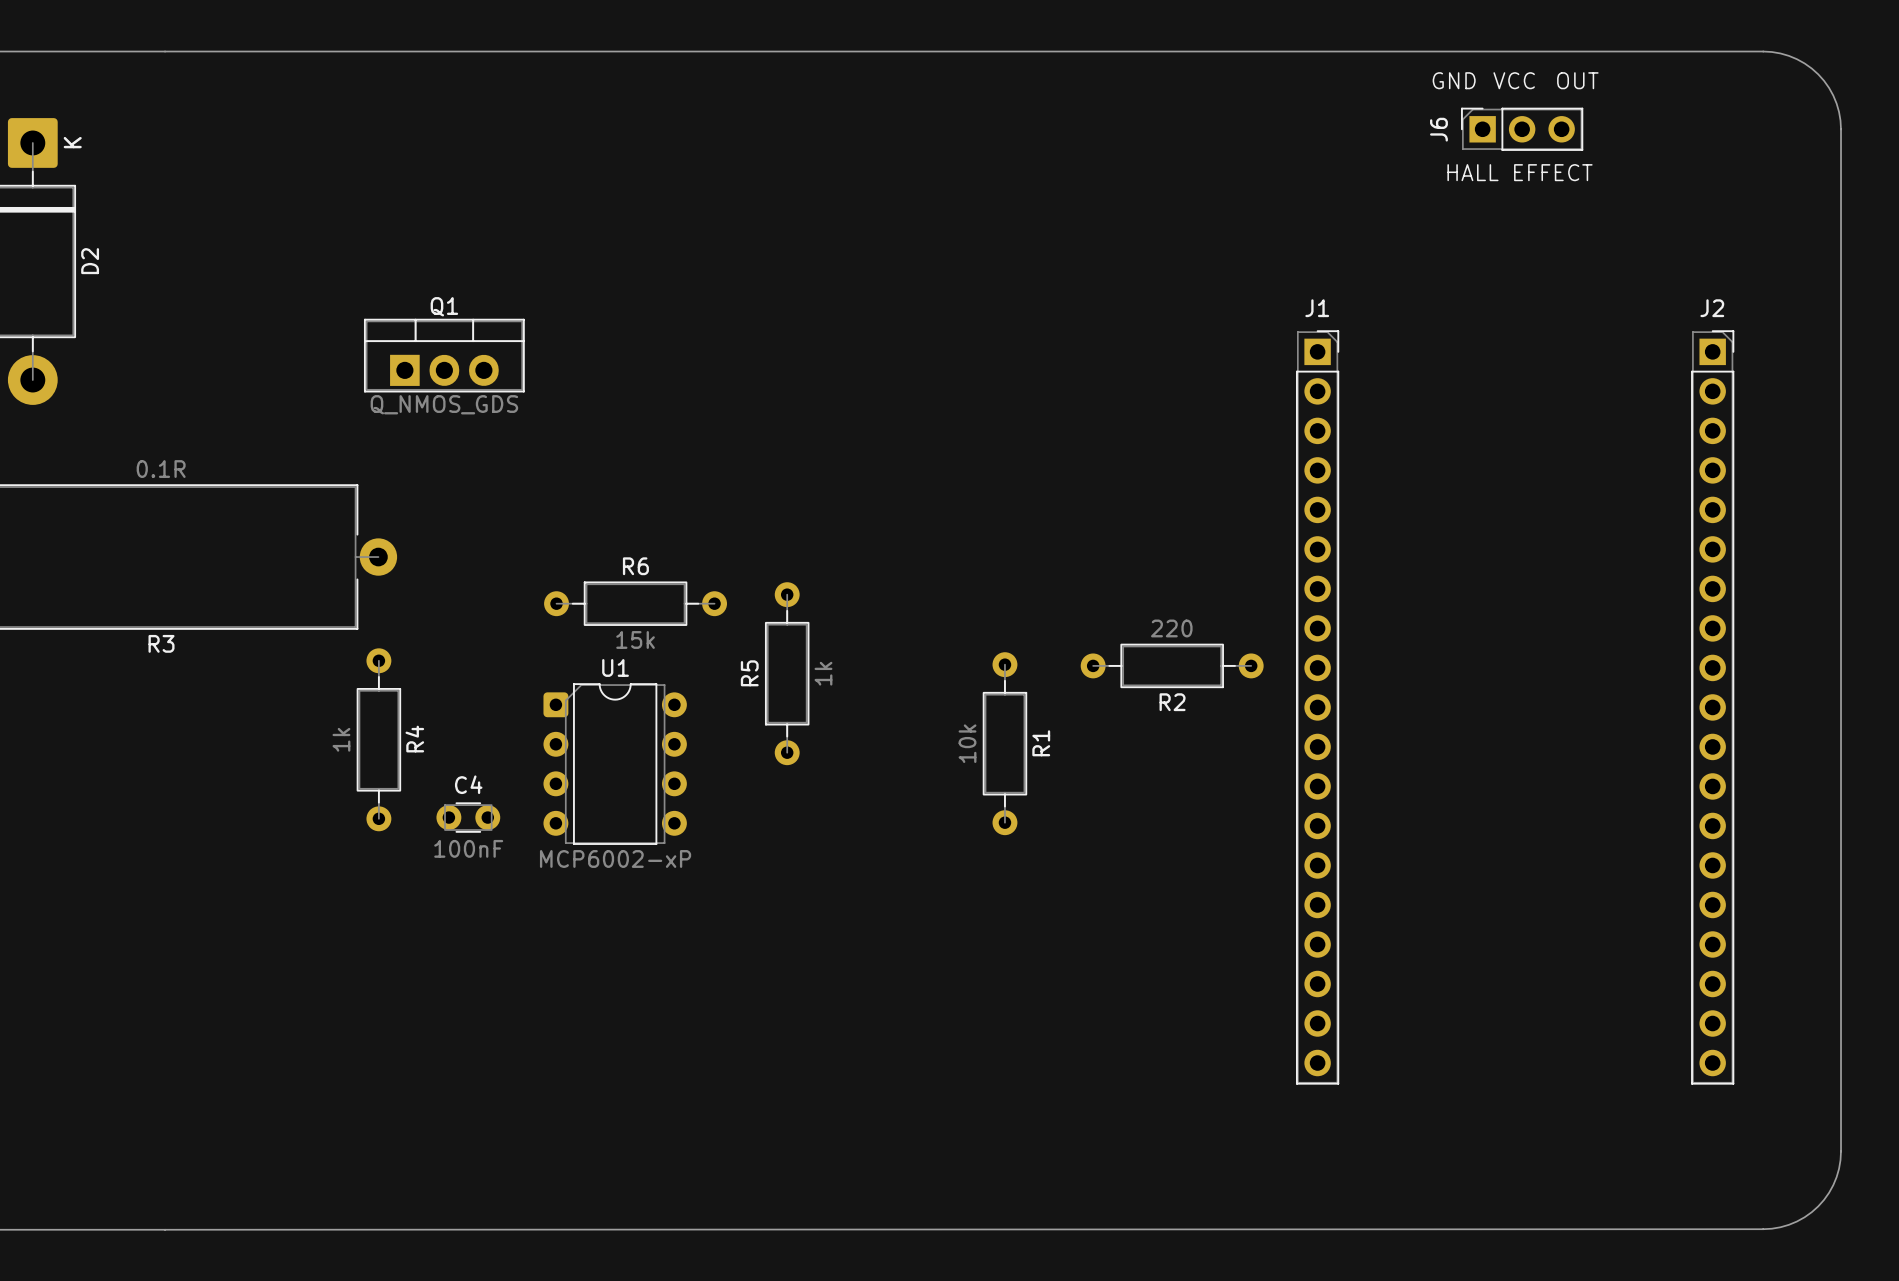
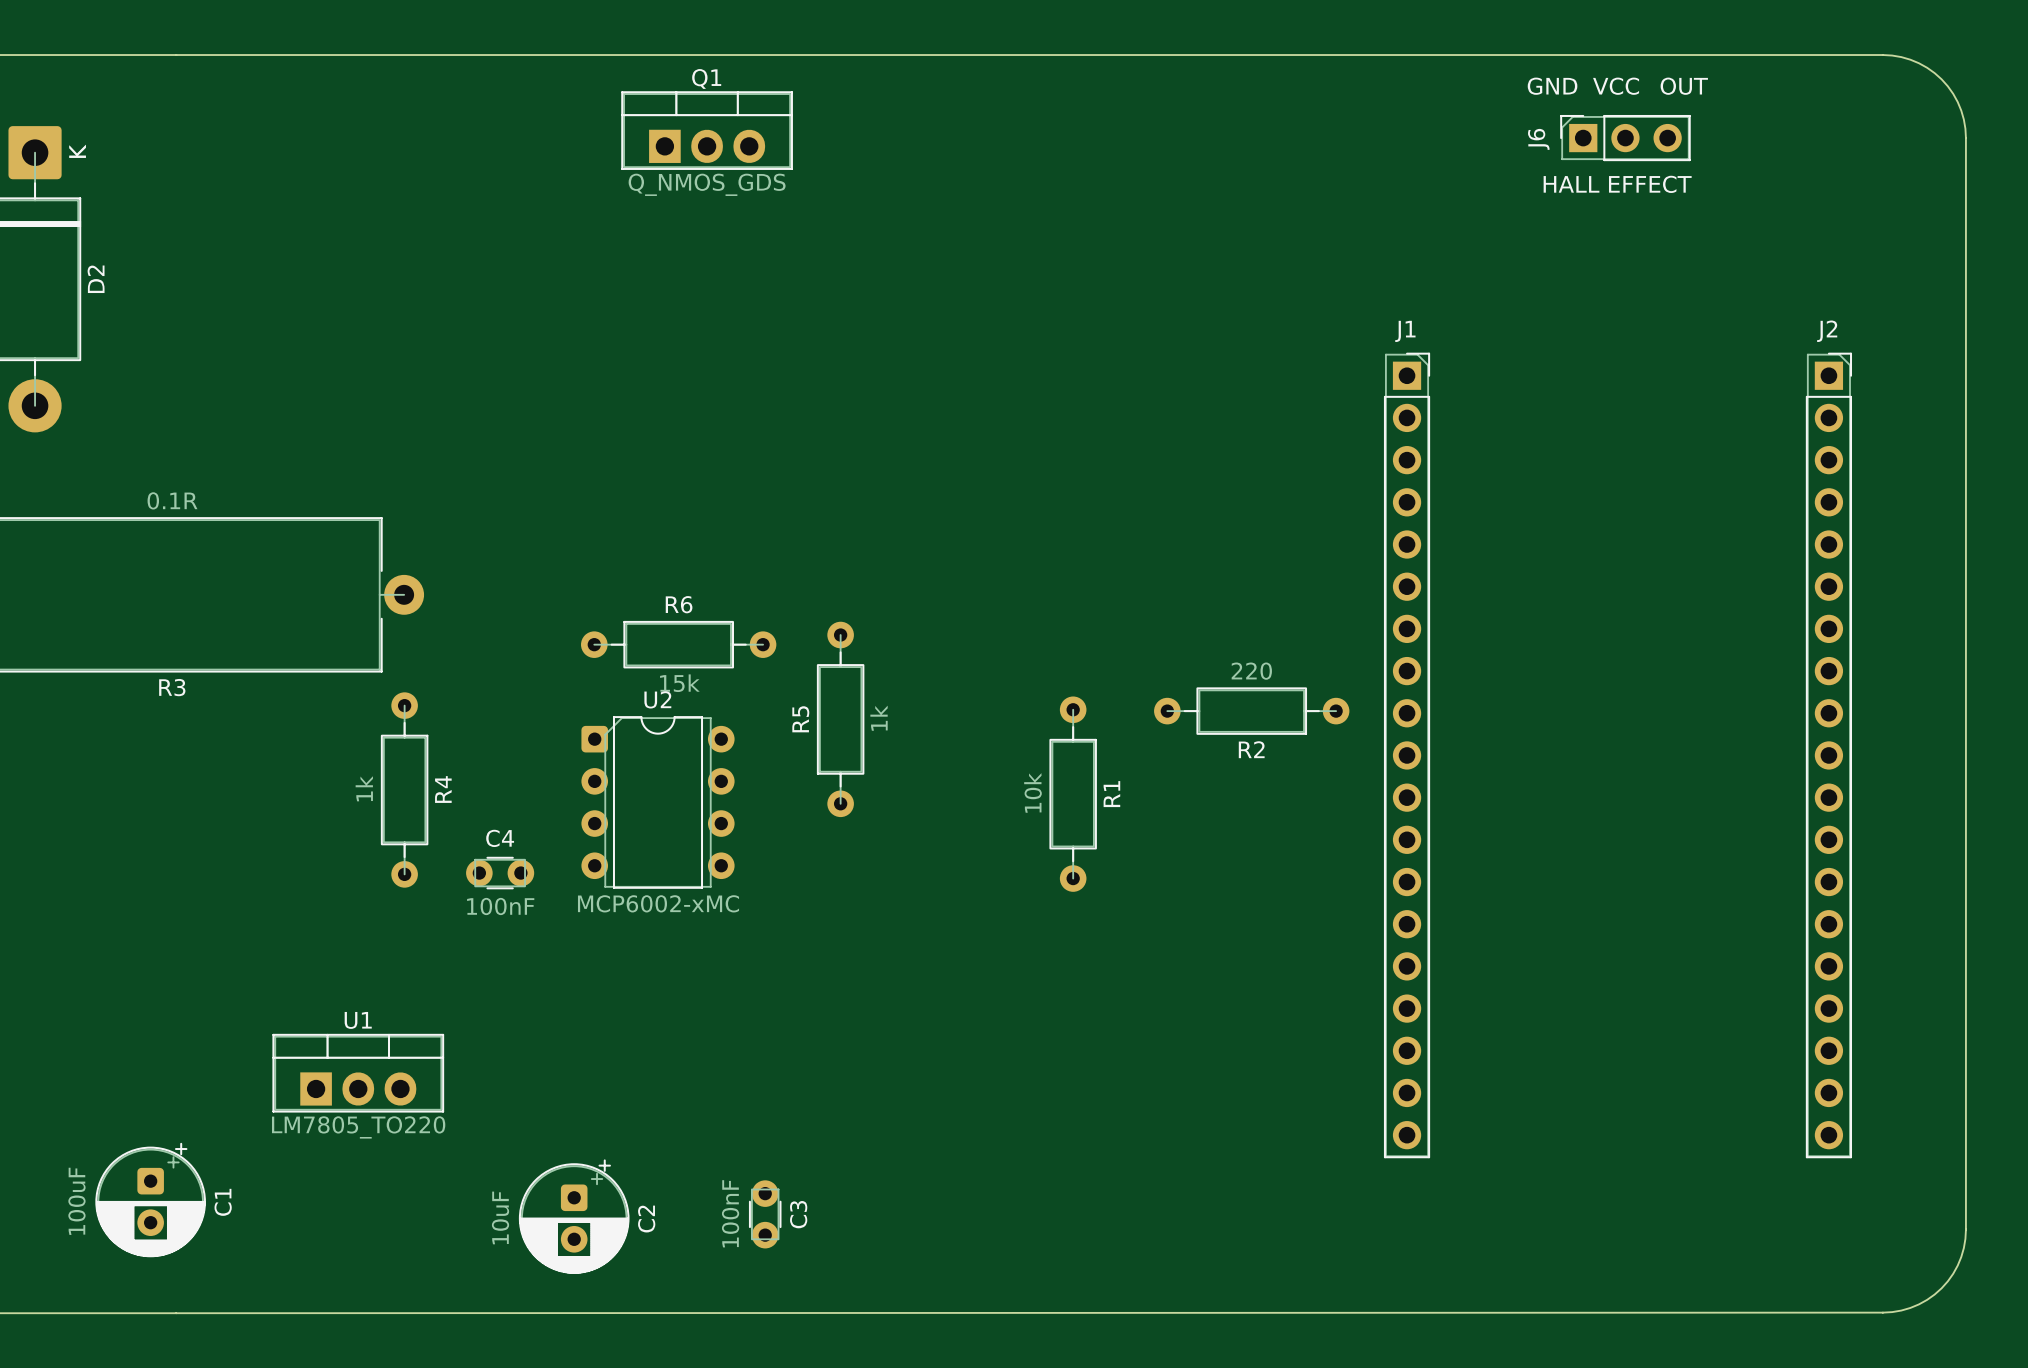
Q1 position: (444, 355) -> (707, 130)
U1 name position: U1 (615, 667) -> U1 (358, 1020)
U1 footprint: [543, 683, 687, 845] -> [272, 1033, 445, 1113]
U2: none -> MCP6002-xMC (658, 802)
U1 value: MCP6002-xP (615, 858) -> LM7805_TO220 (358, 1127)
C1: none -> 100uF (150, 1200)
C3: none -> 100nF (765, 1214)
C2: none -> 10uF (574, 1216)

